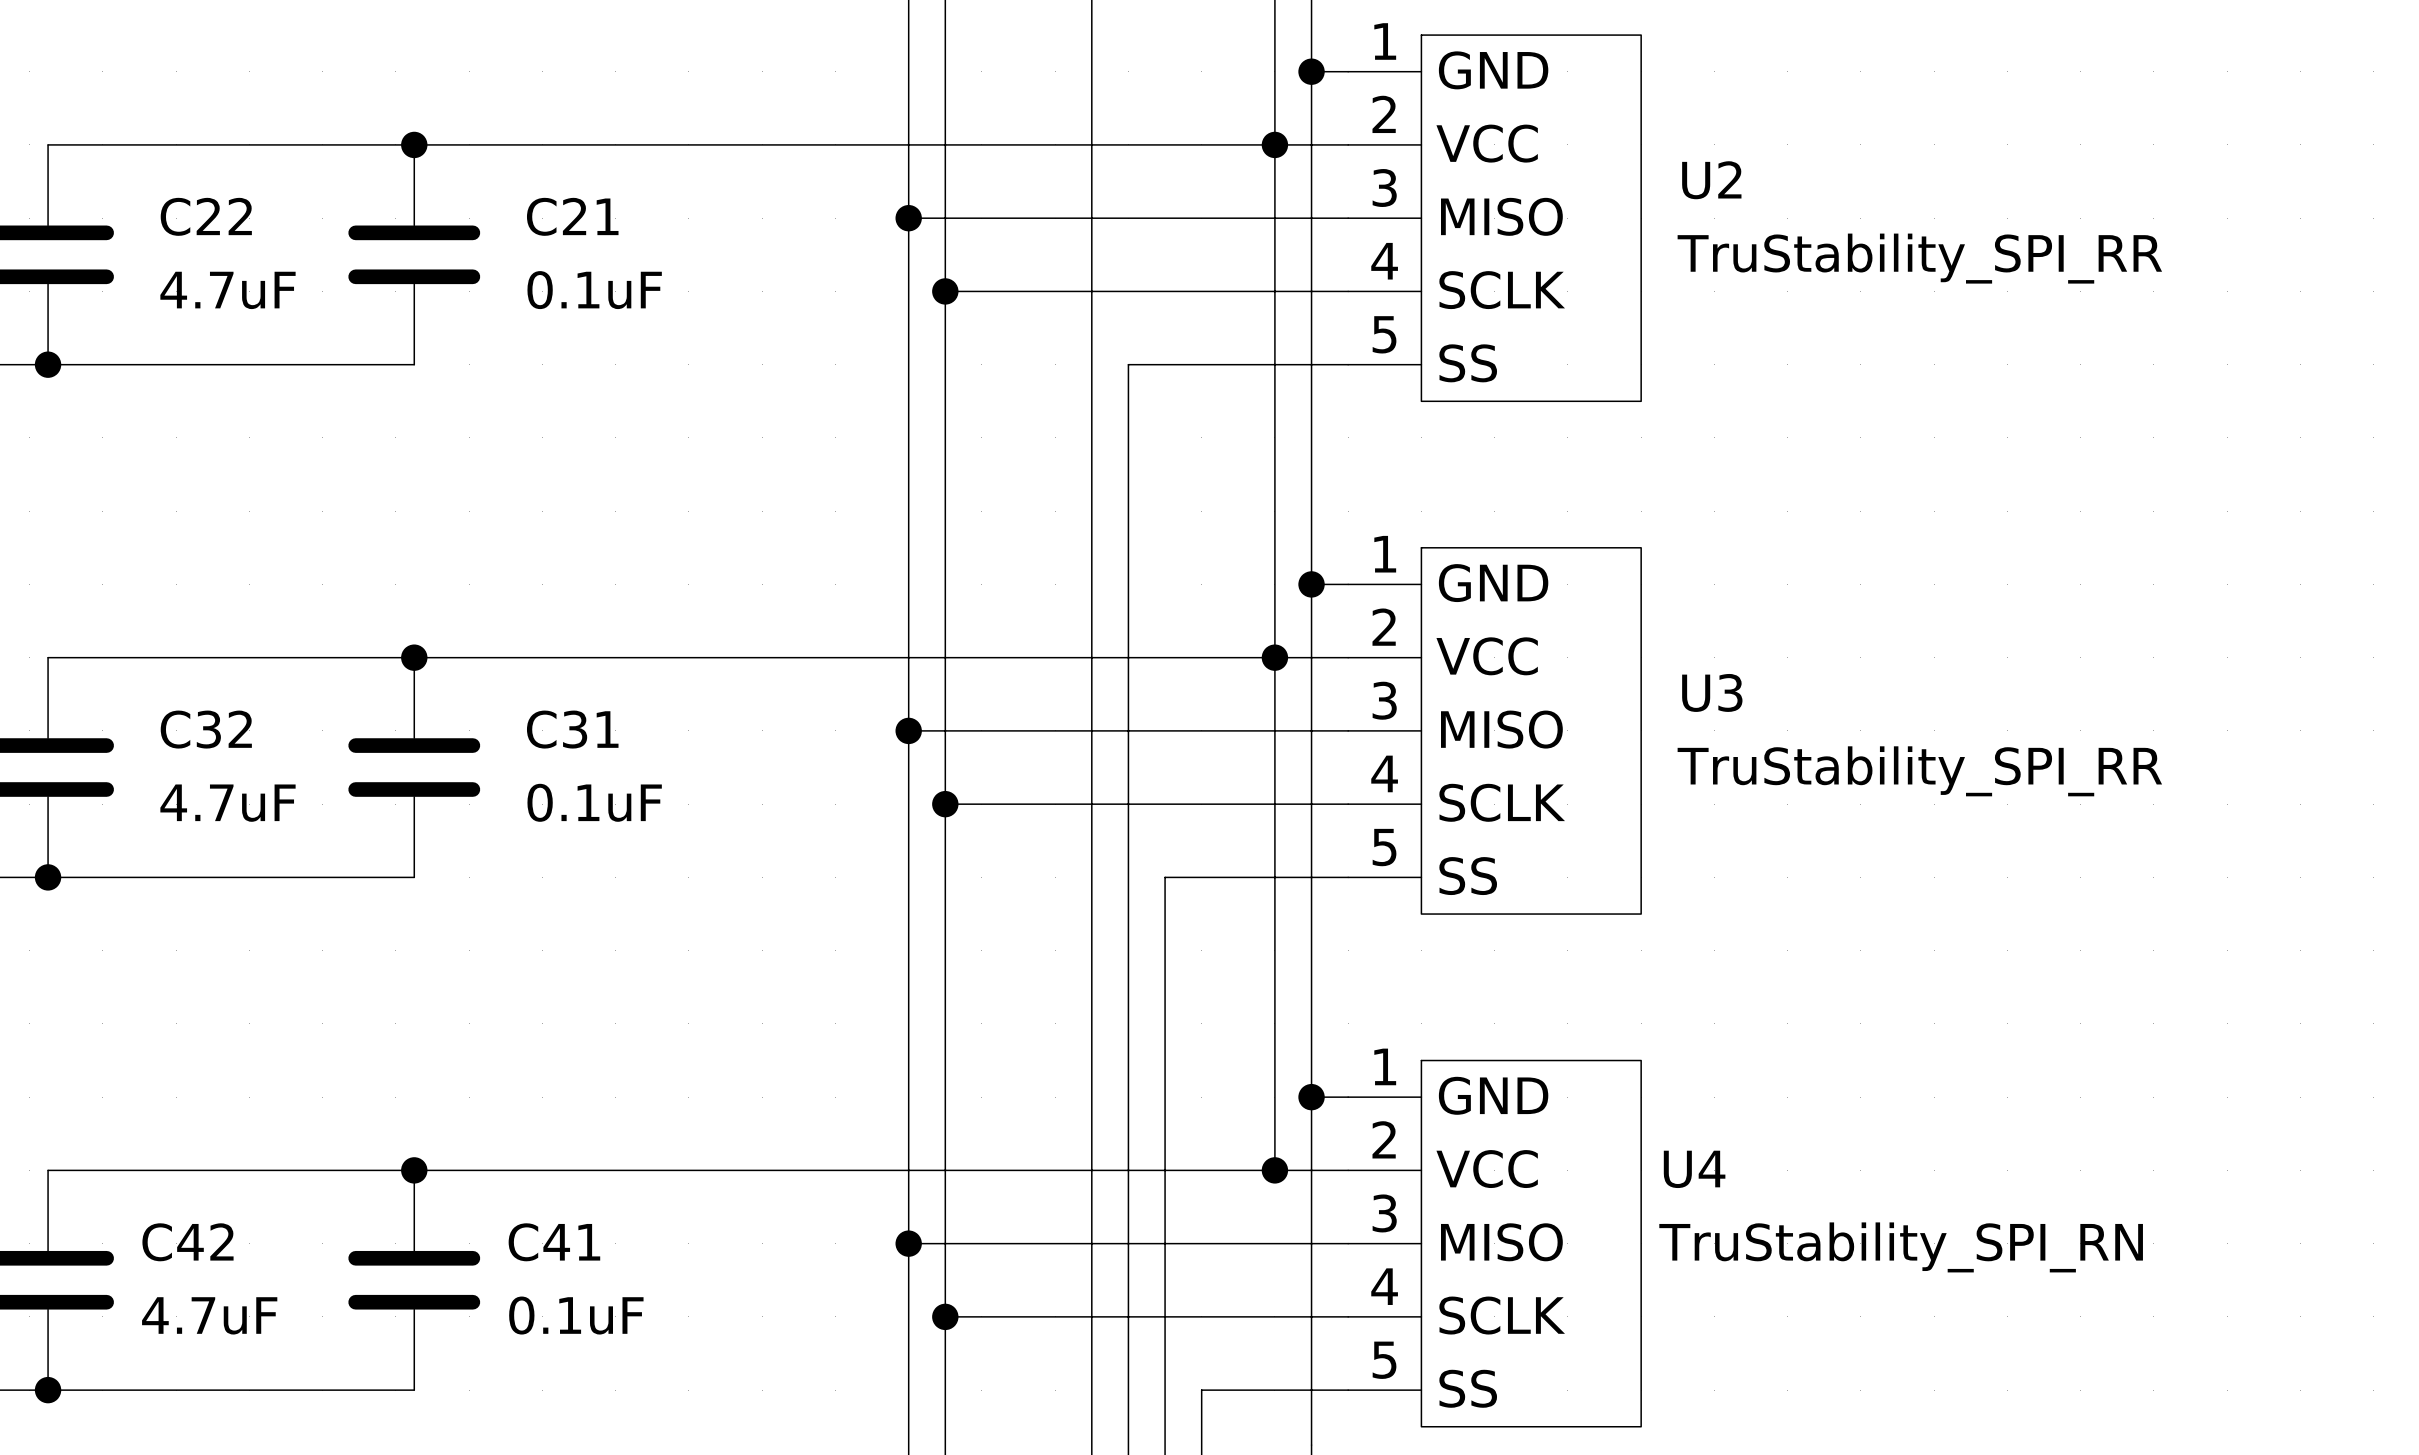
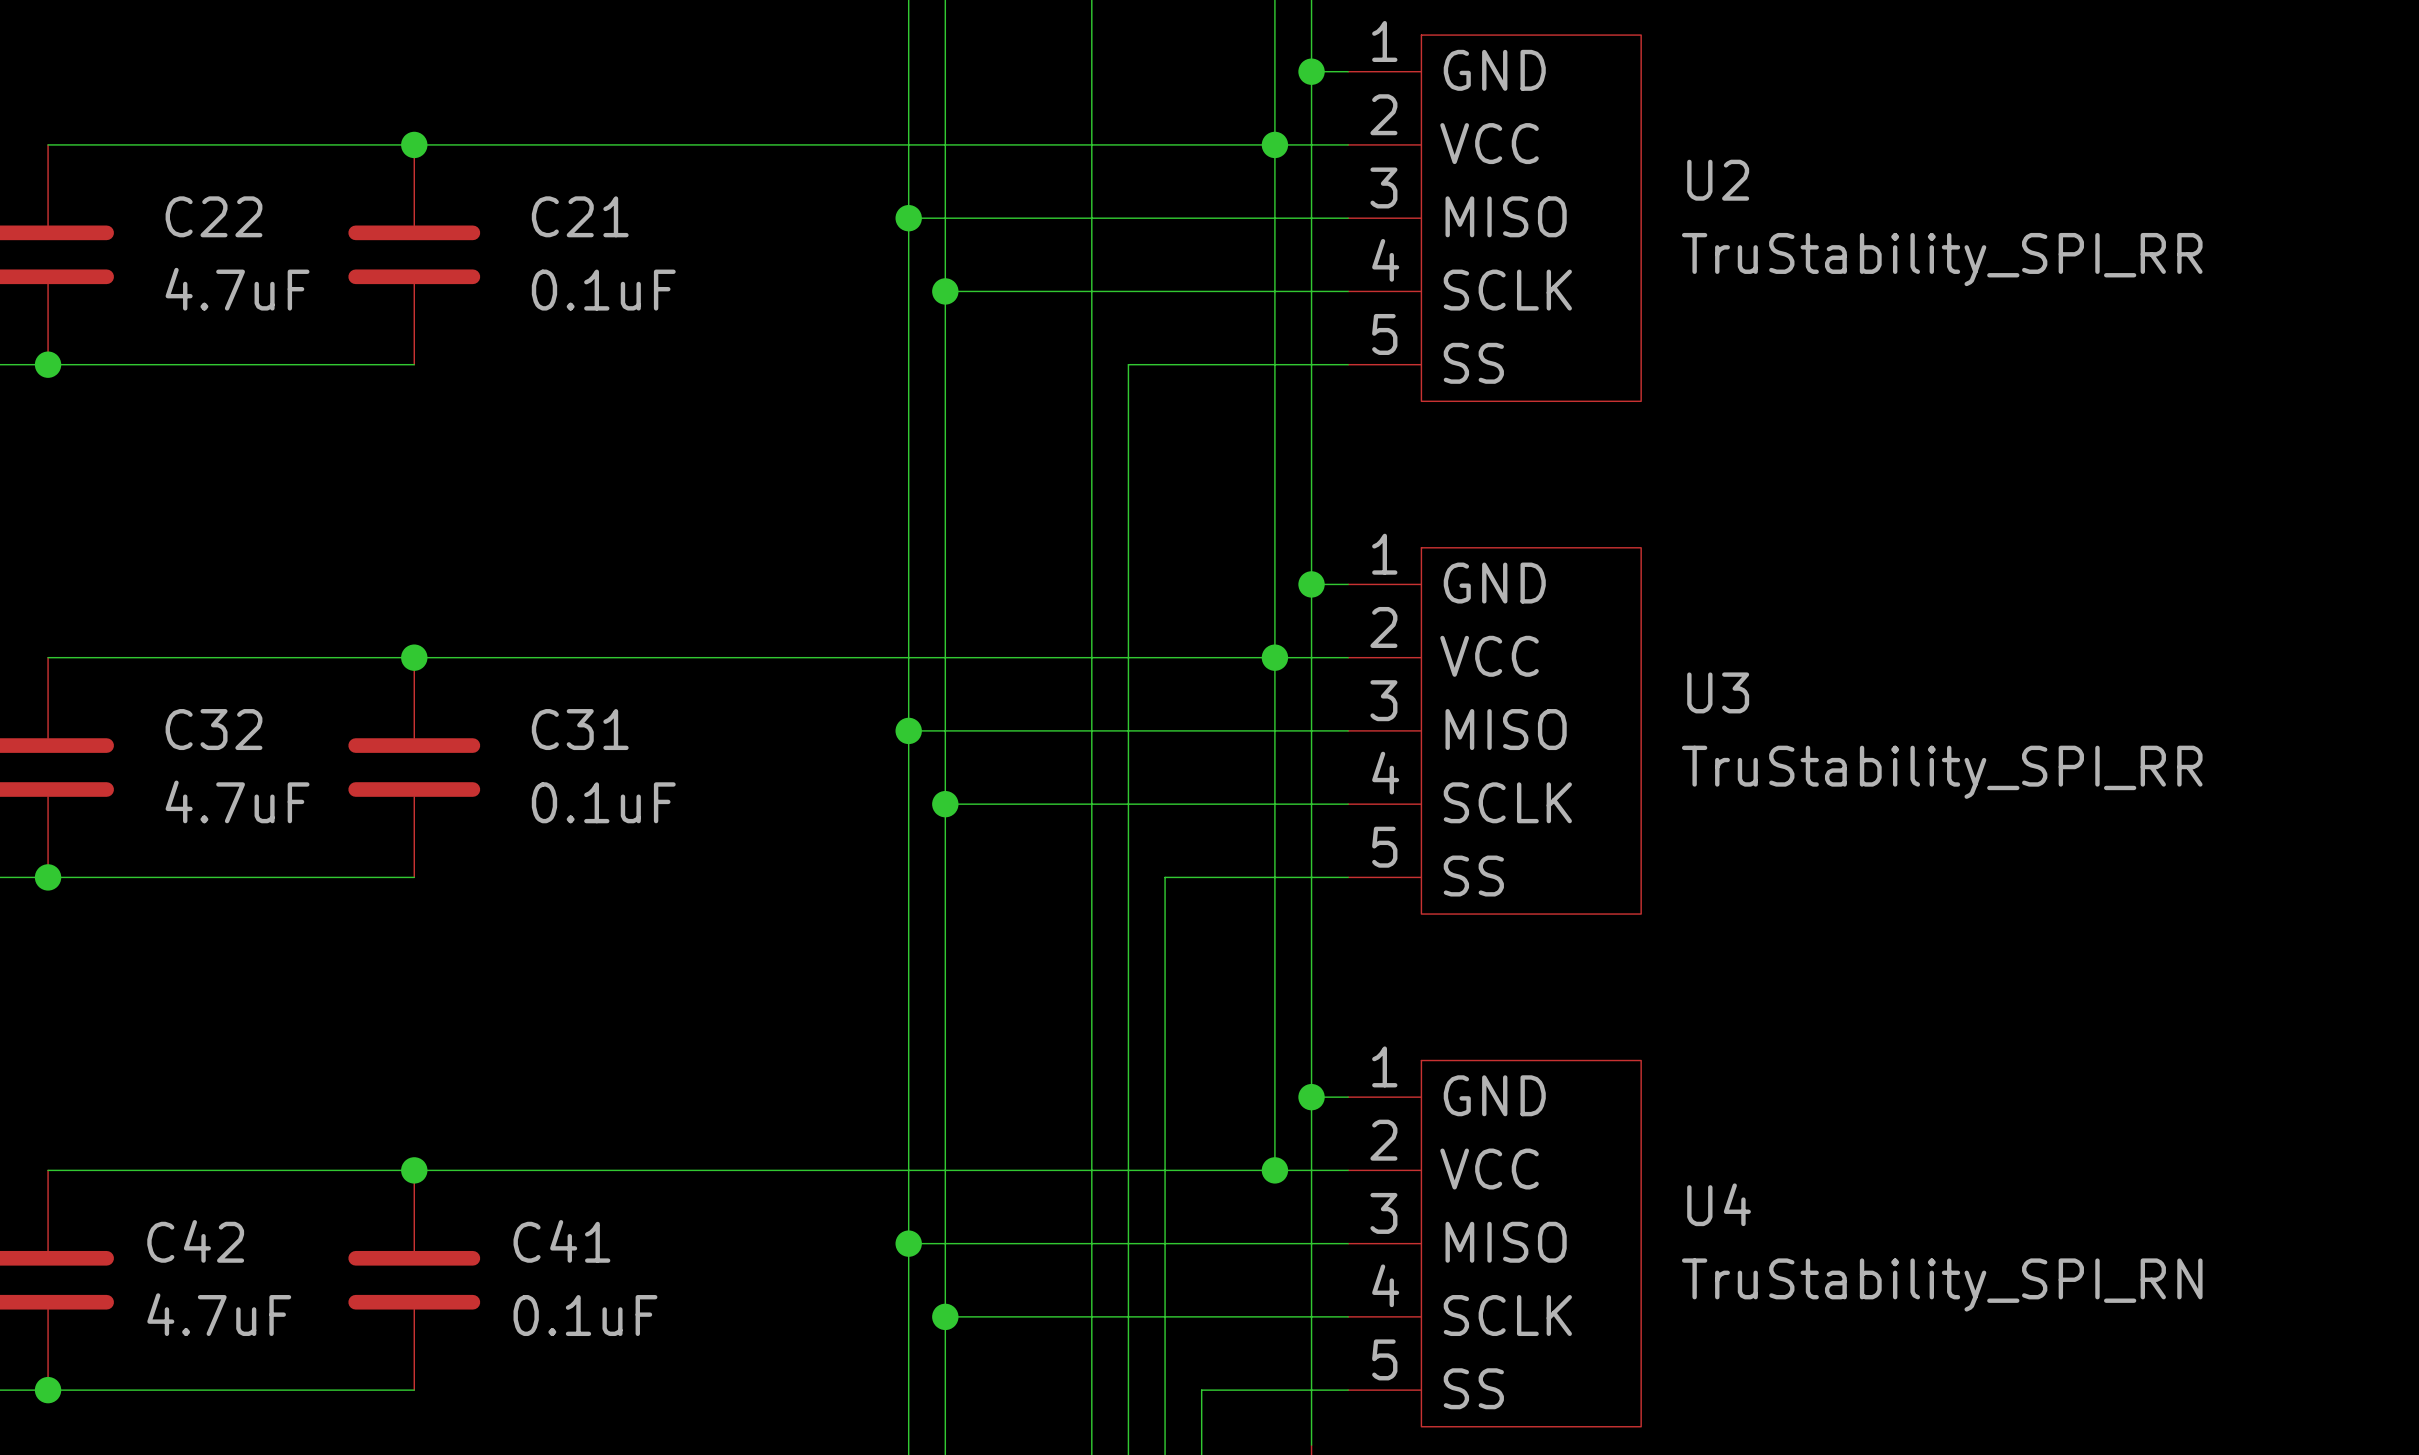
U4 name position: U4 (1694, 1169) -> U4 (1719, 1204)
U4 value position: TruStability_SPI_RN (1901, 1247) -> TruStability_SPI_RN (1942, 1284)

